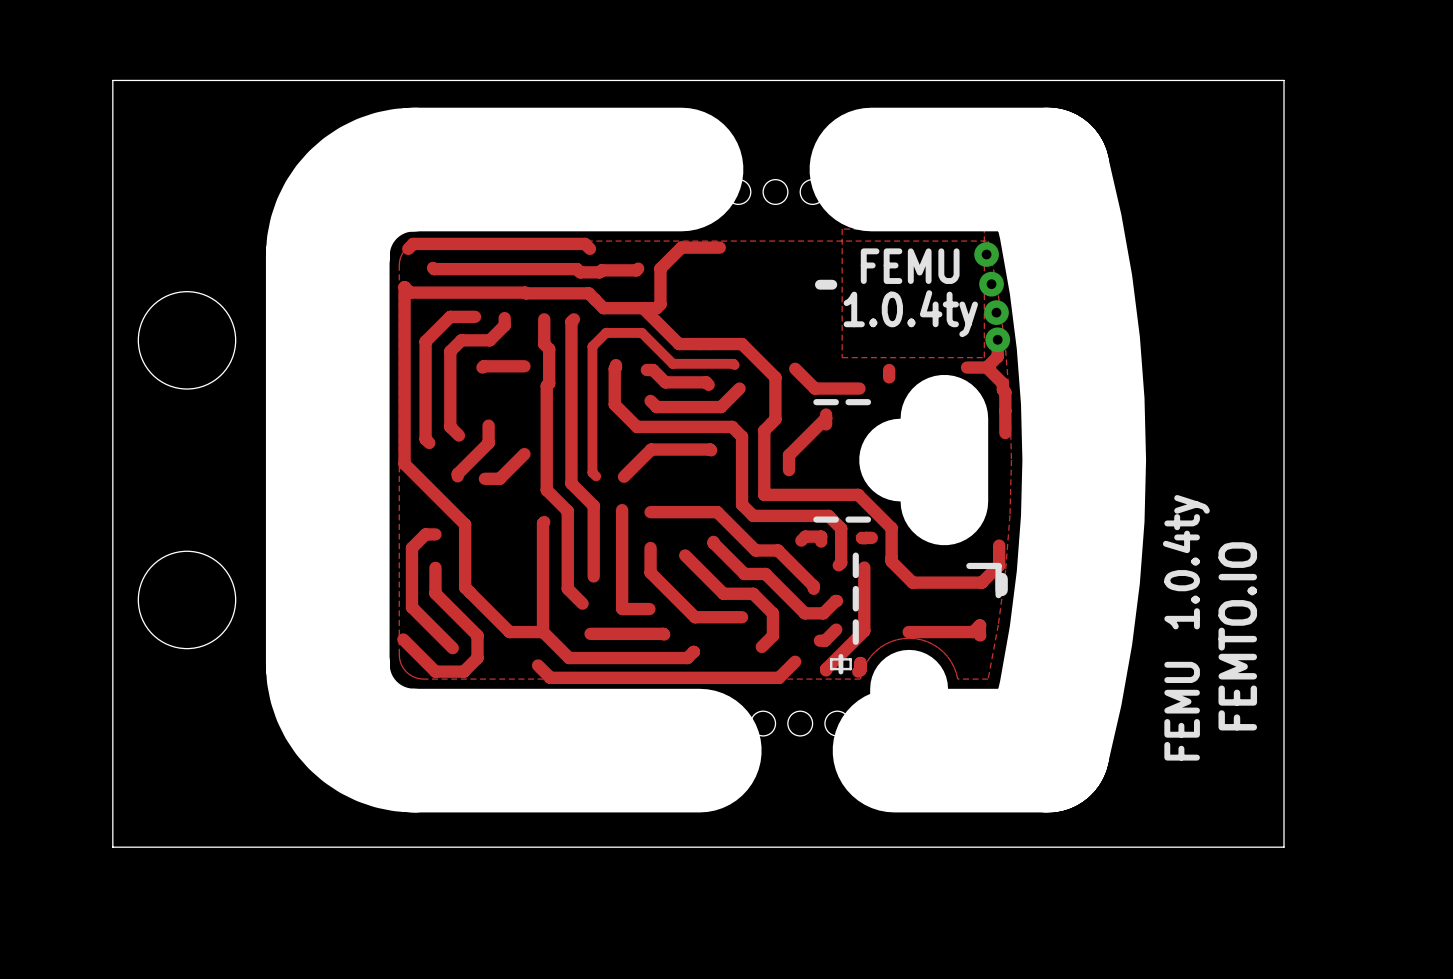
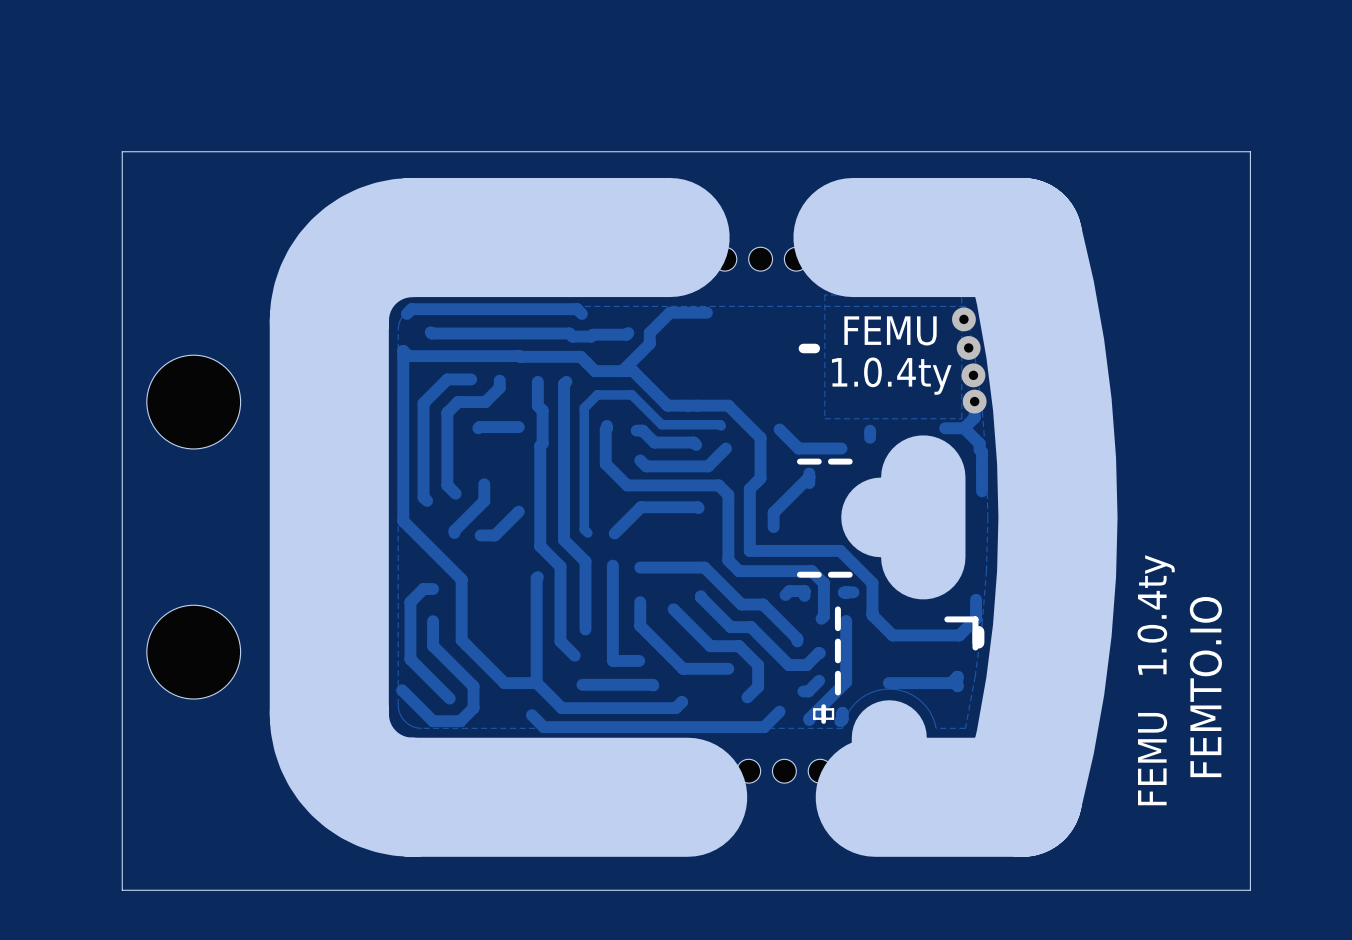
track: (660, 279) (660, 304) (656, 308) (643, 308) -> (649, 343) (622, 371)

